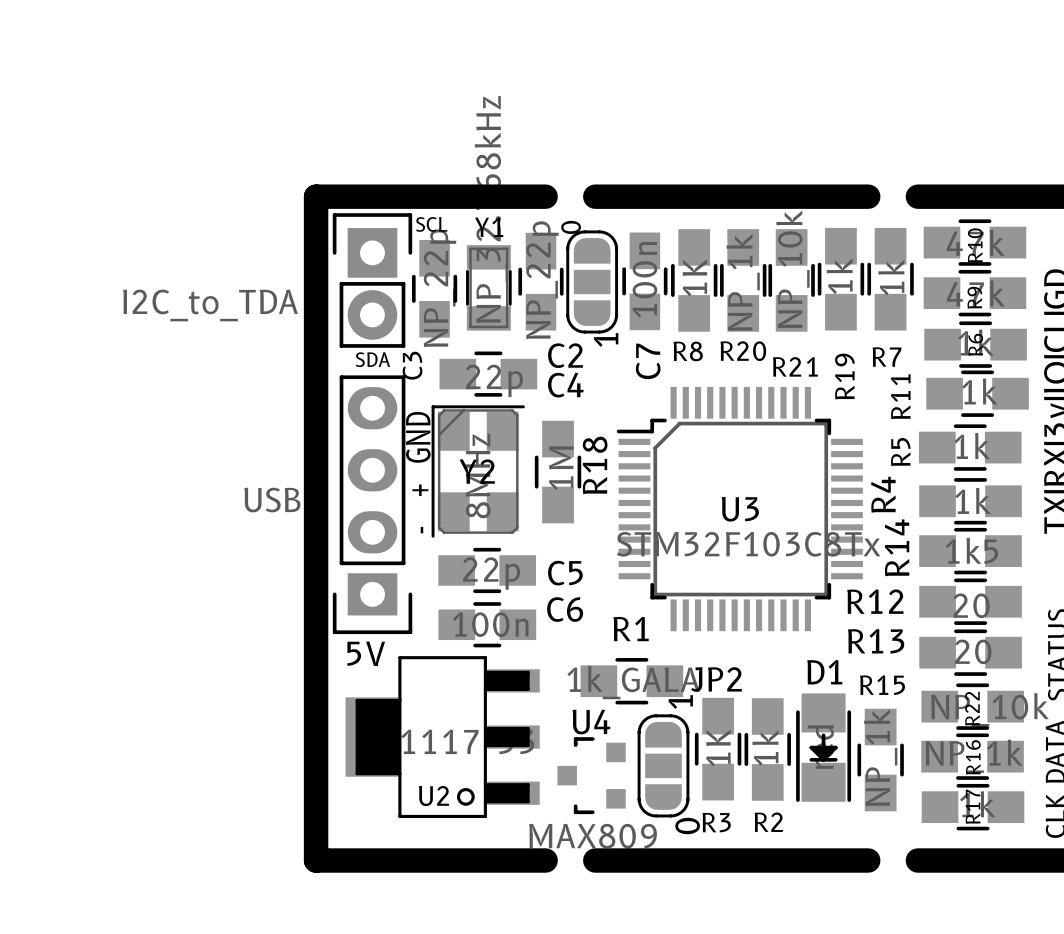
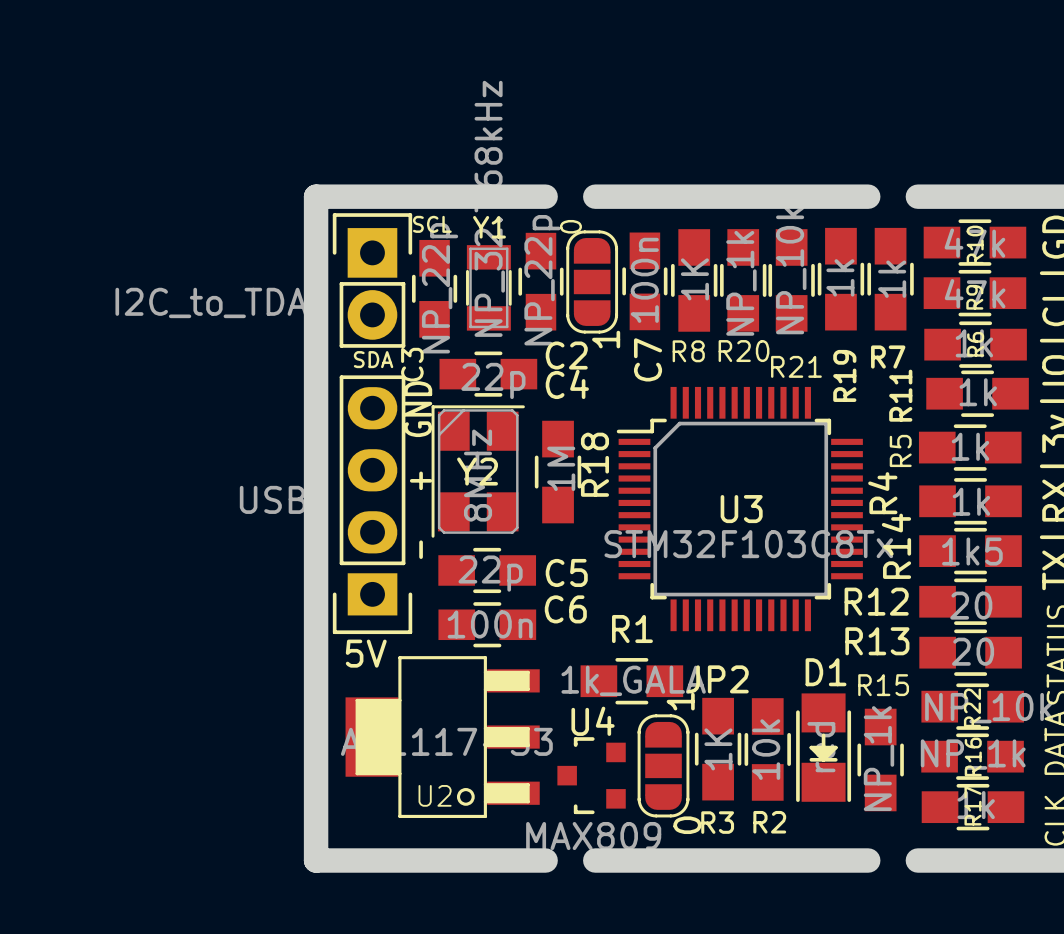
R2 value: 1k (765, 748) -> 10k (766, 749)

